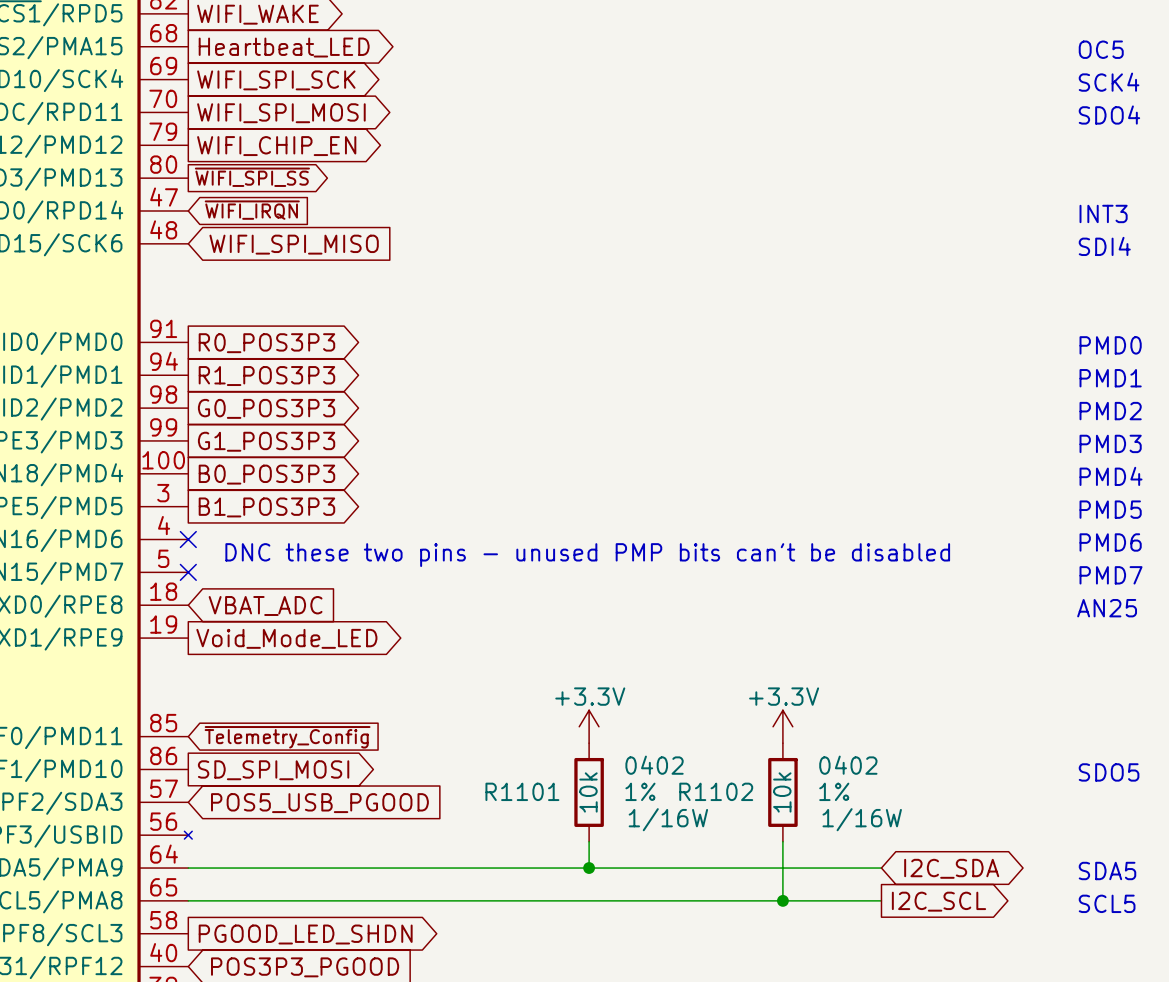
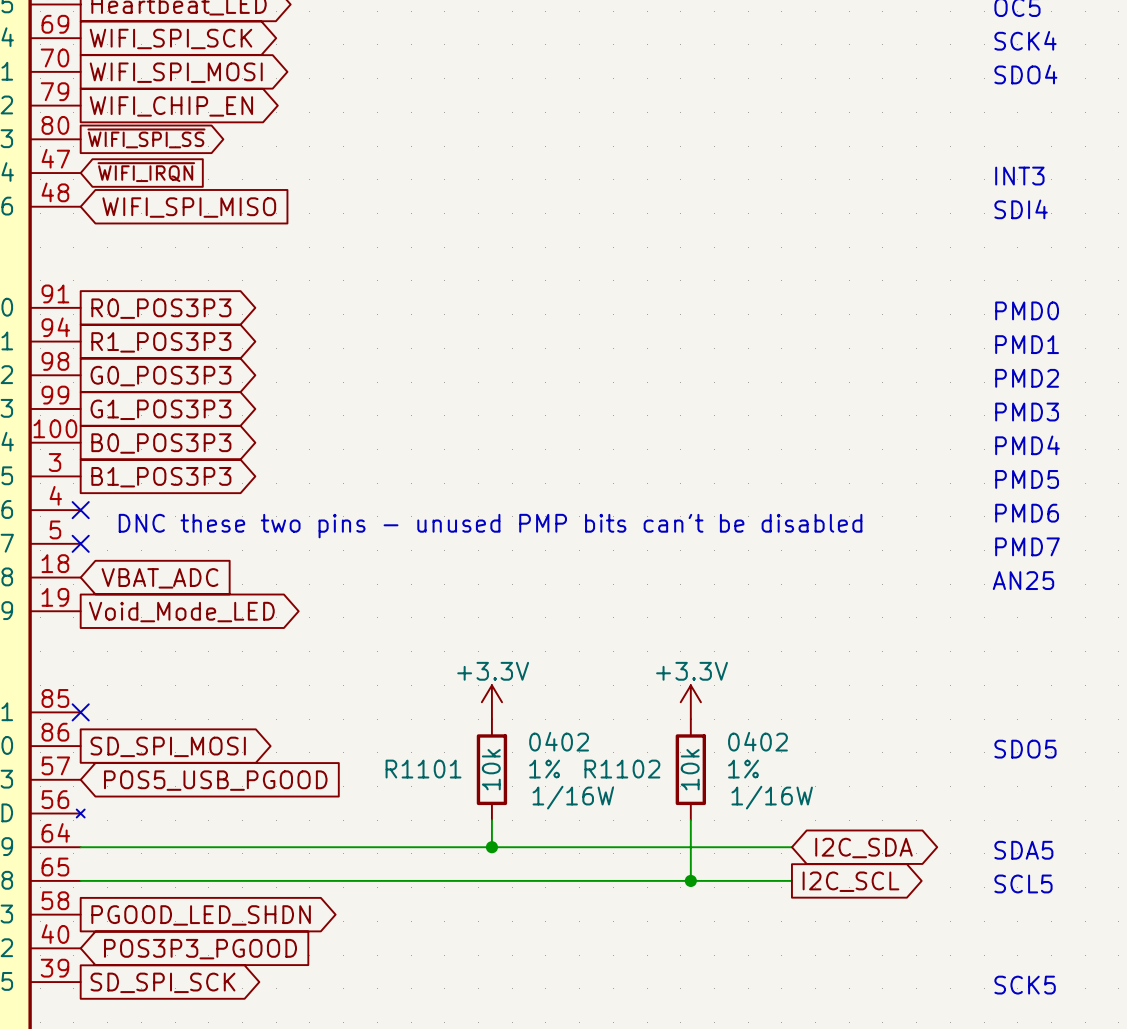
no-connect mark: none -> (80, 712)
global label: ~{Telemetry_Config} (287, 737) -> none

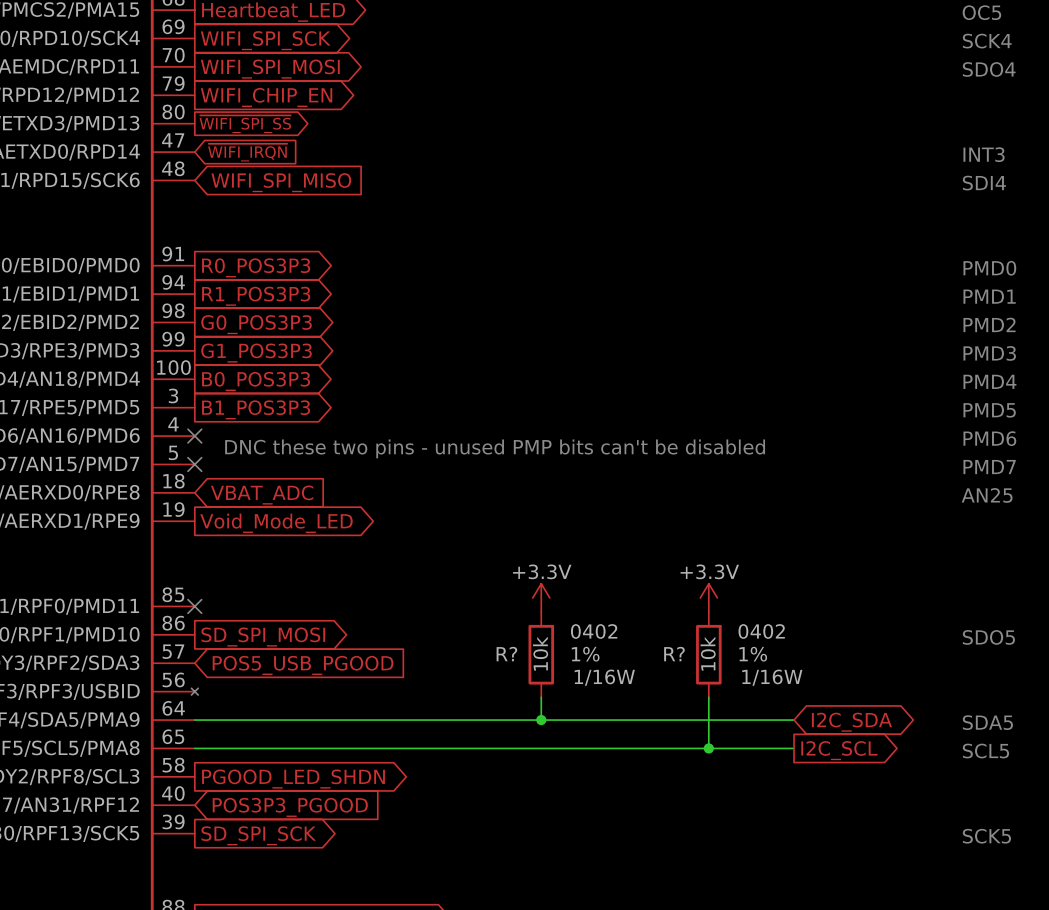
R1101 name: R1101 (423, 769) -> R? (506, 654)
R1102 name: R1102 (622, 769) -> R? (674, 654)

